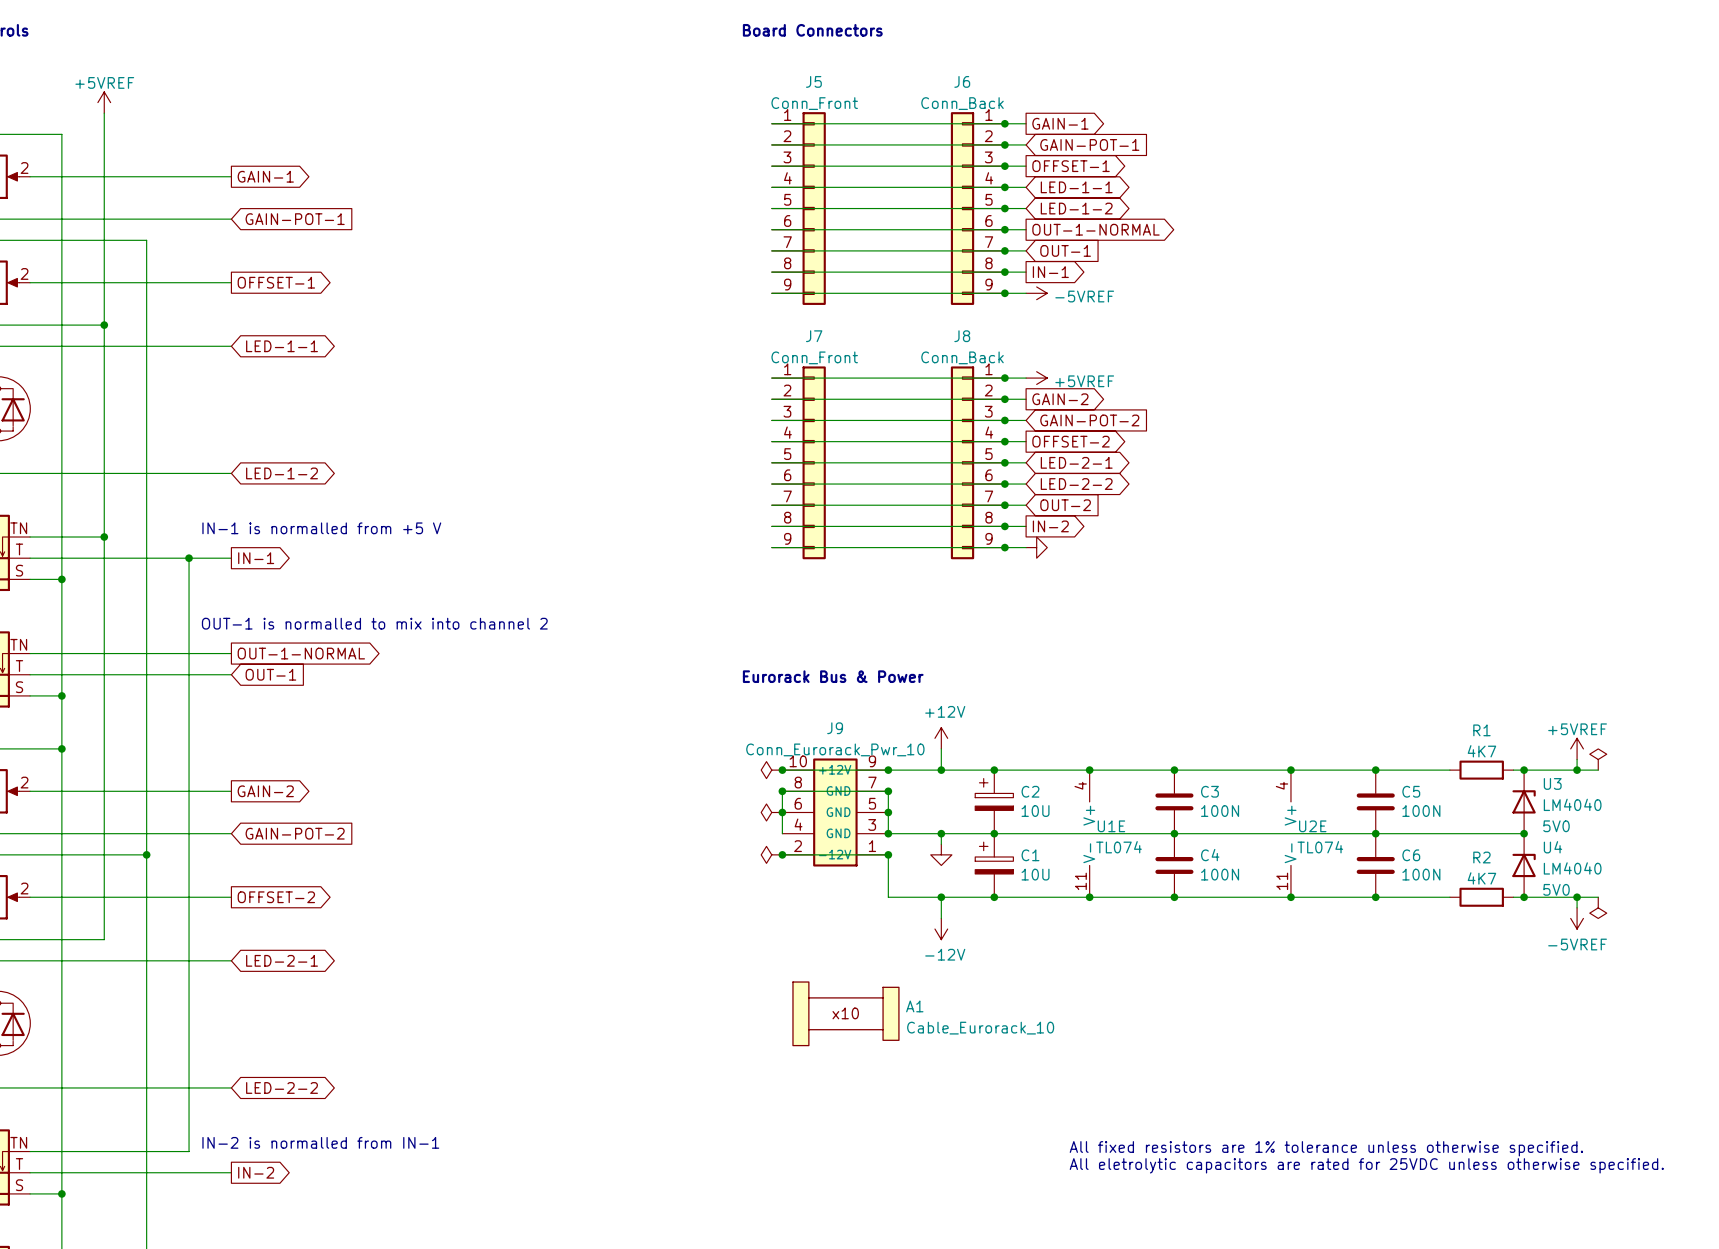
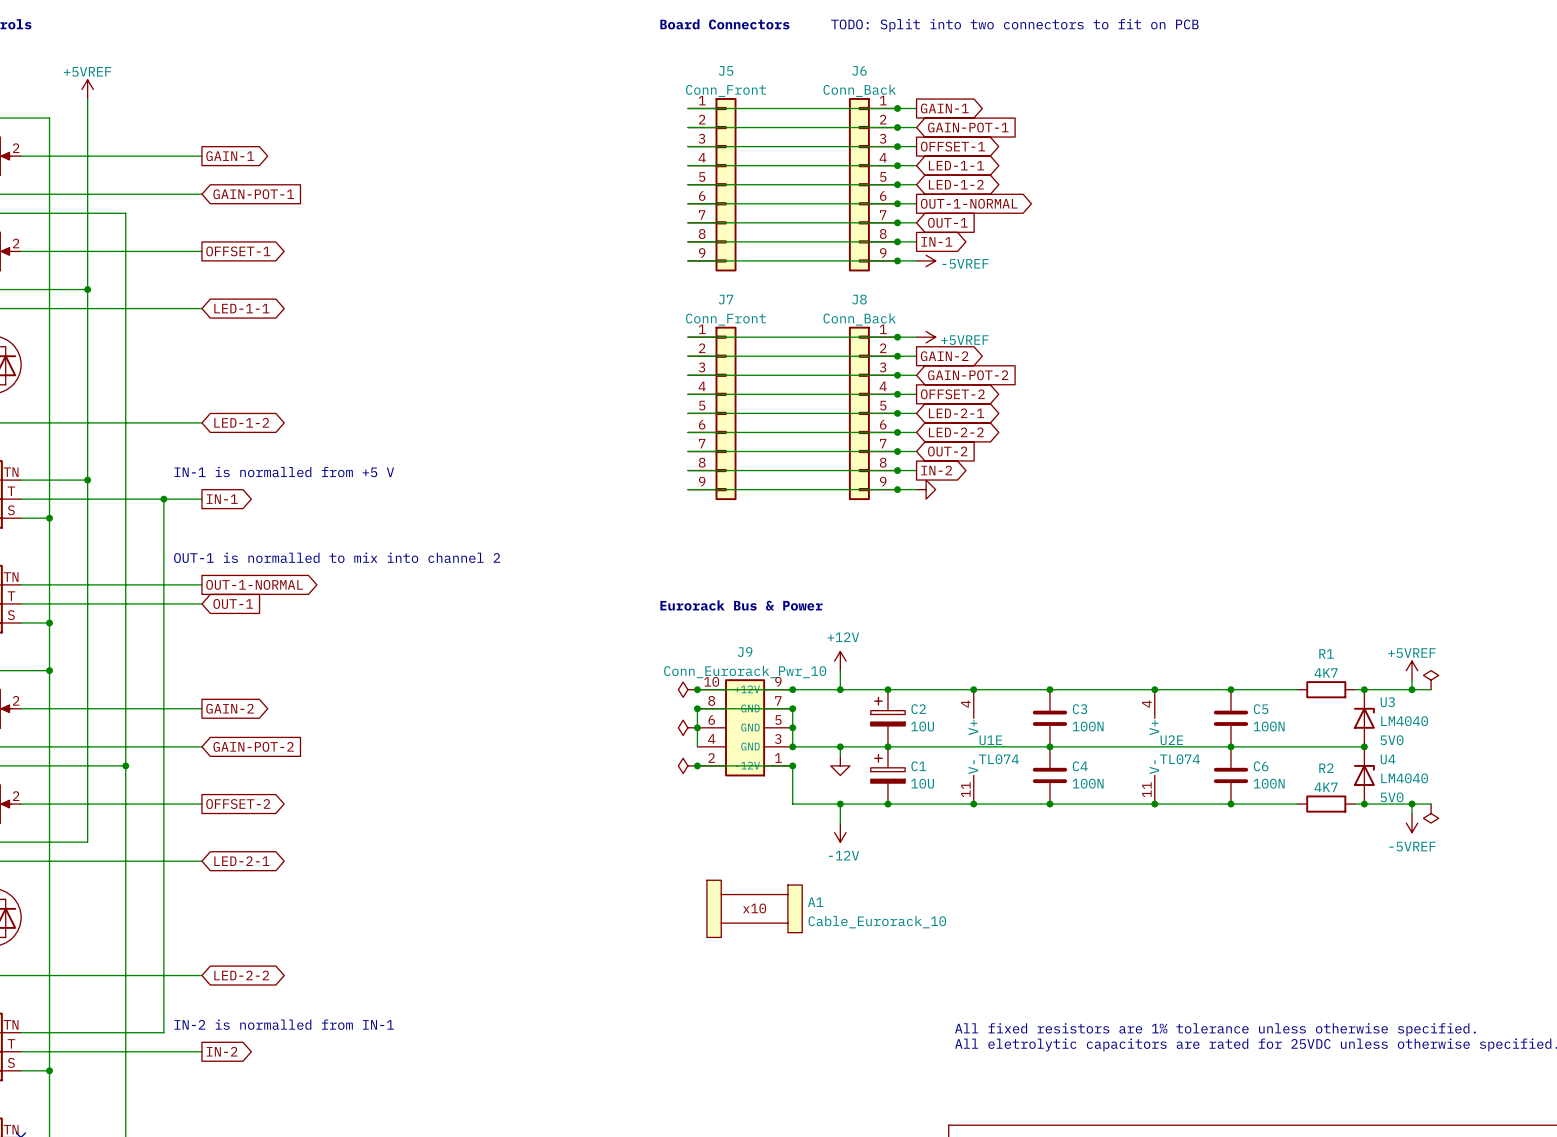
text: none -> TODO: Split into two connectors to fit on PCB (1014, 25)

